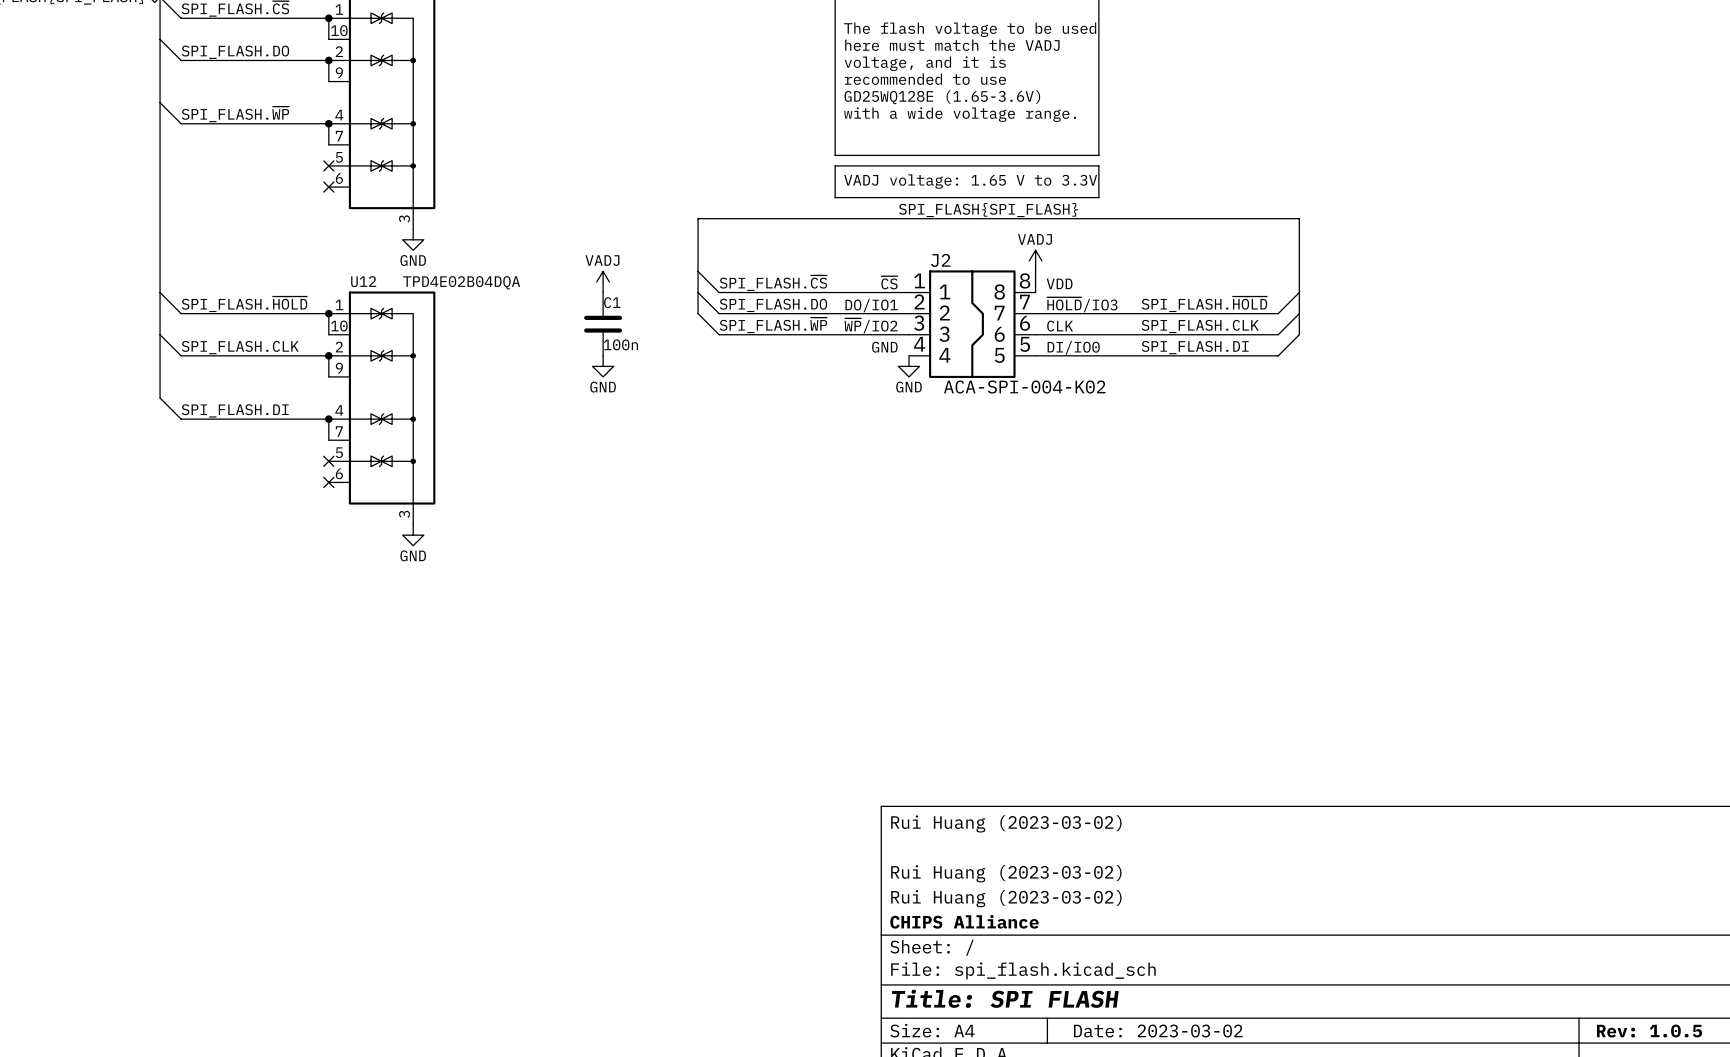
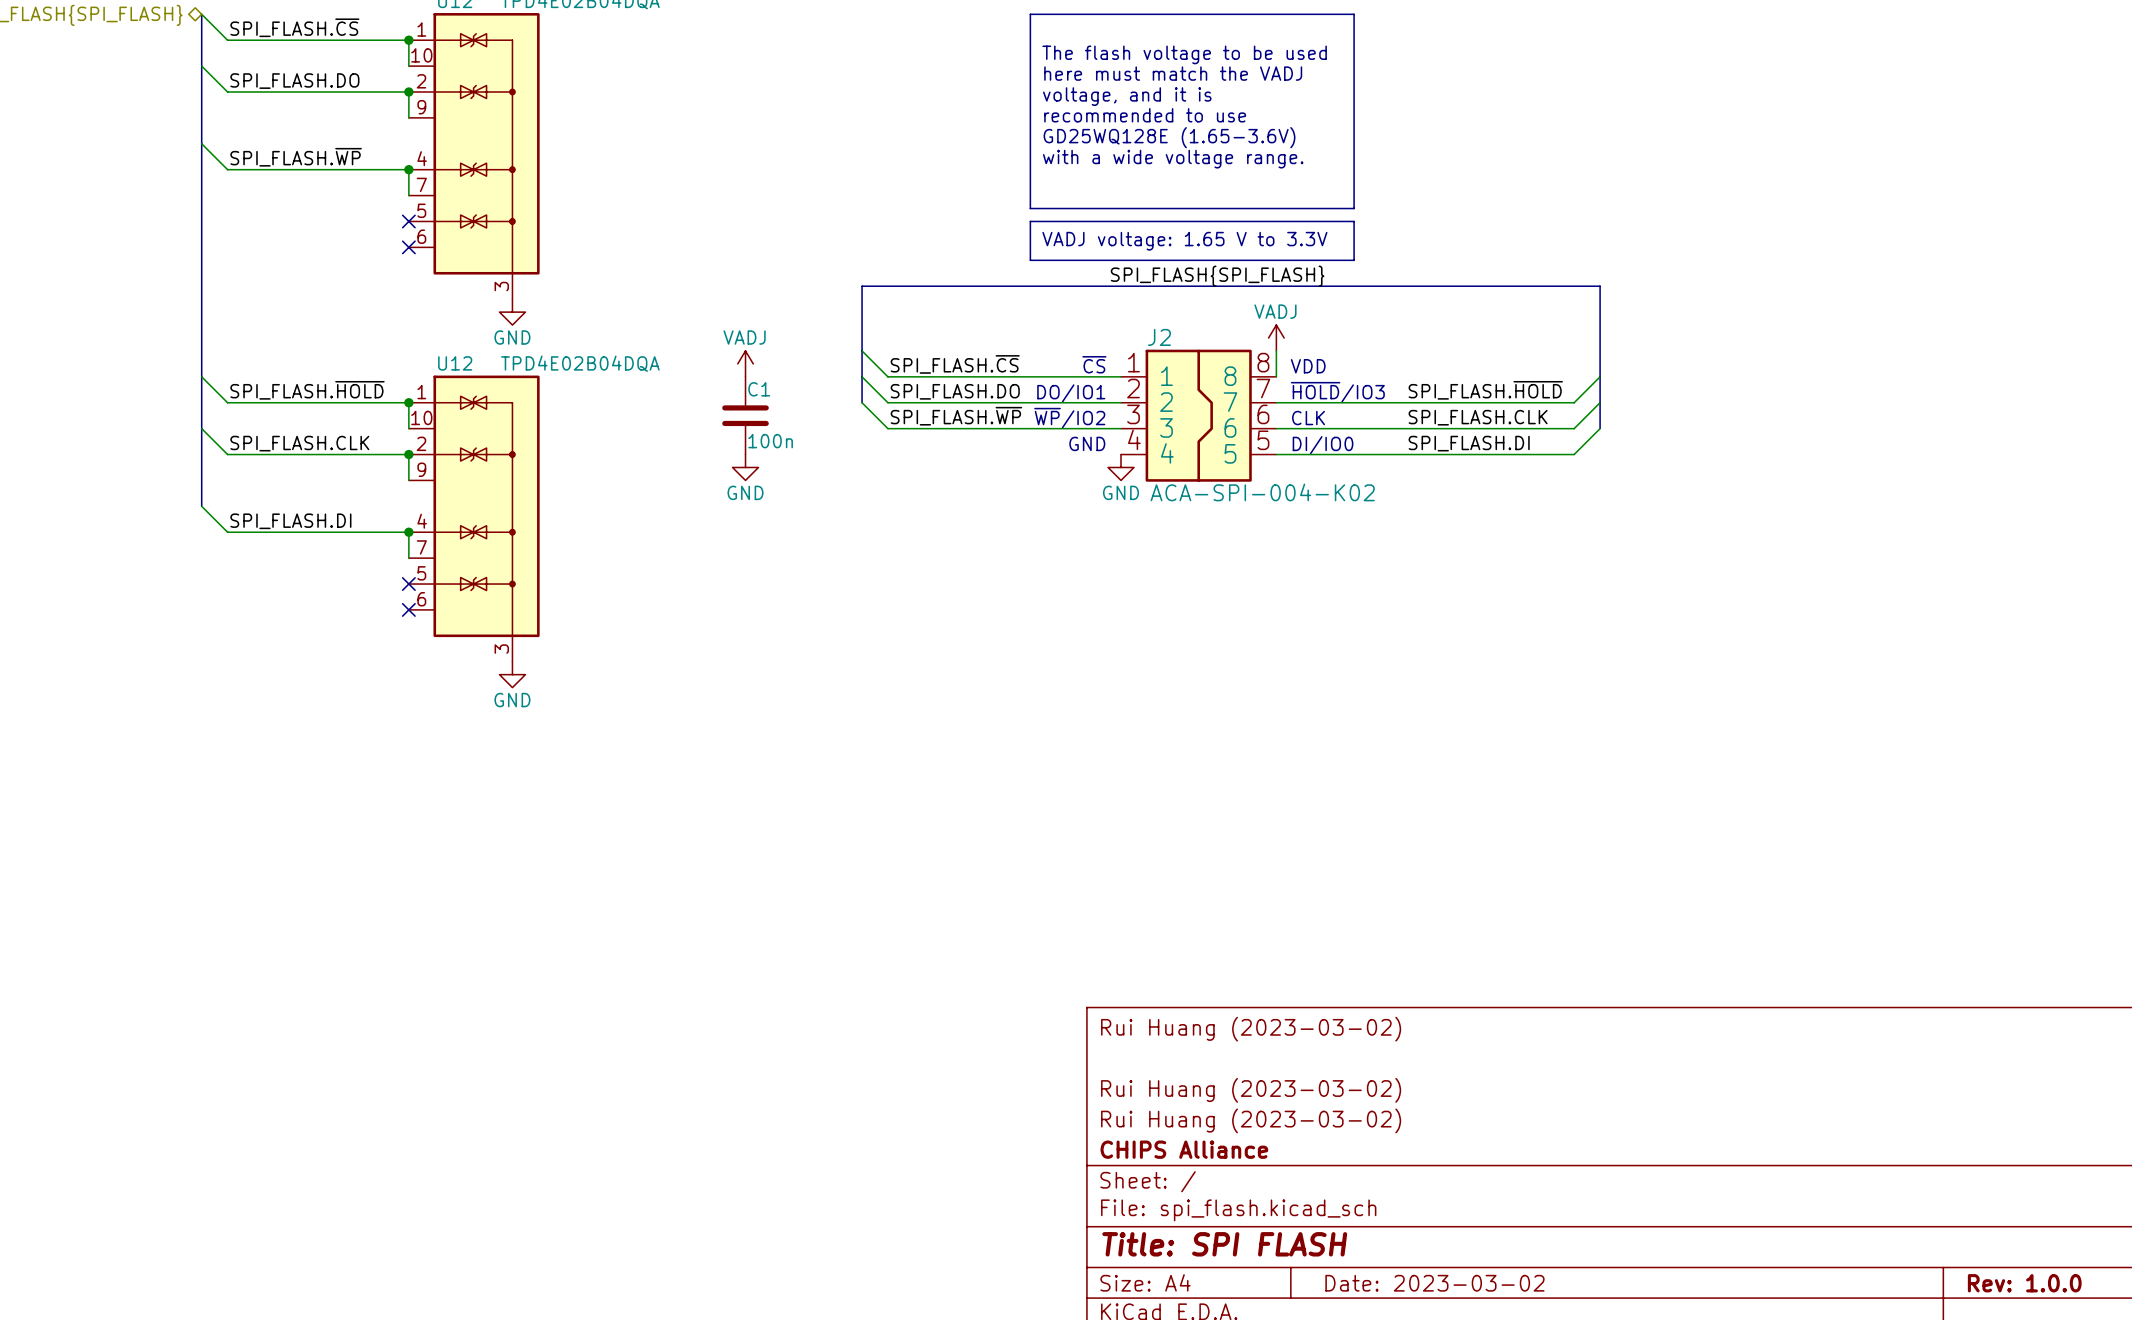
title block: Rev: 1.0.5 (1649, 1031) -> Rev: 1.0.0 (2024, 1283)

